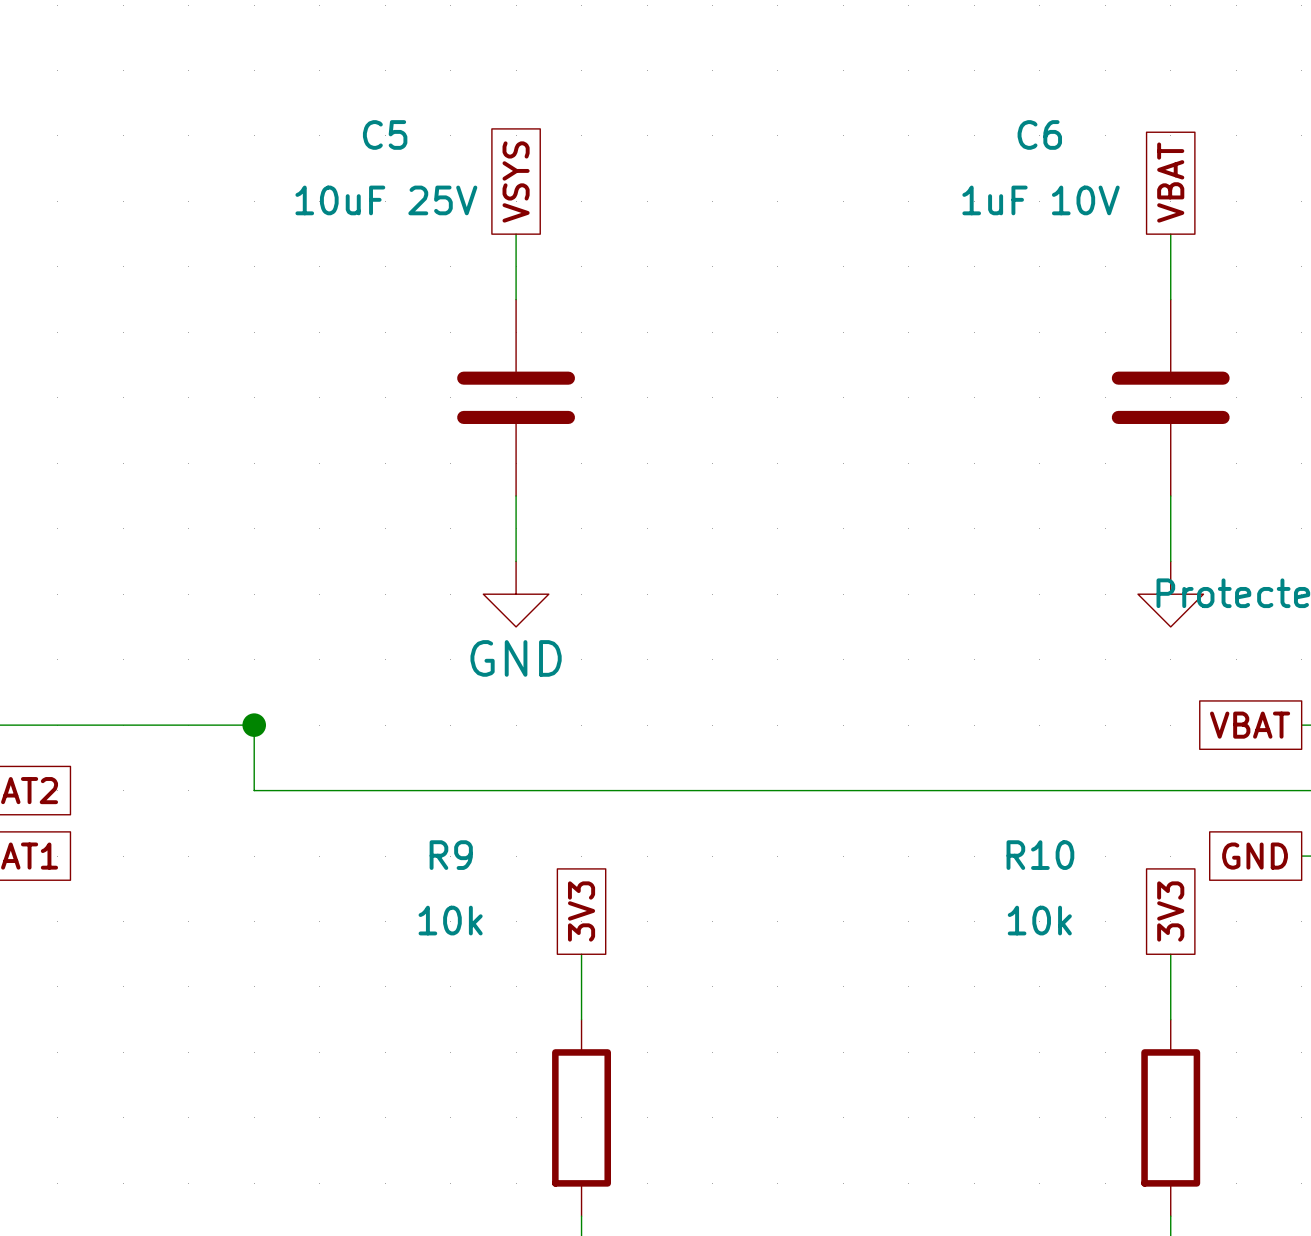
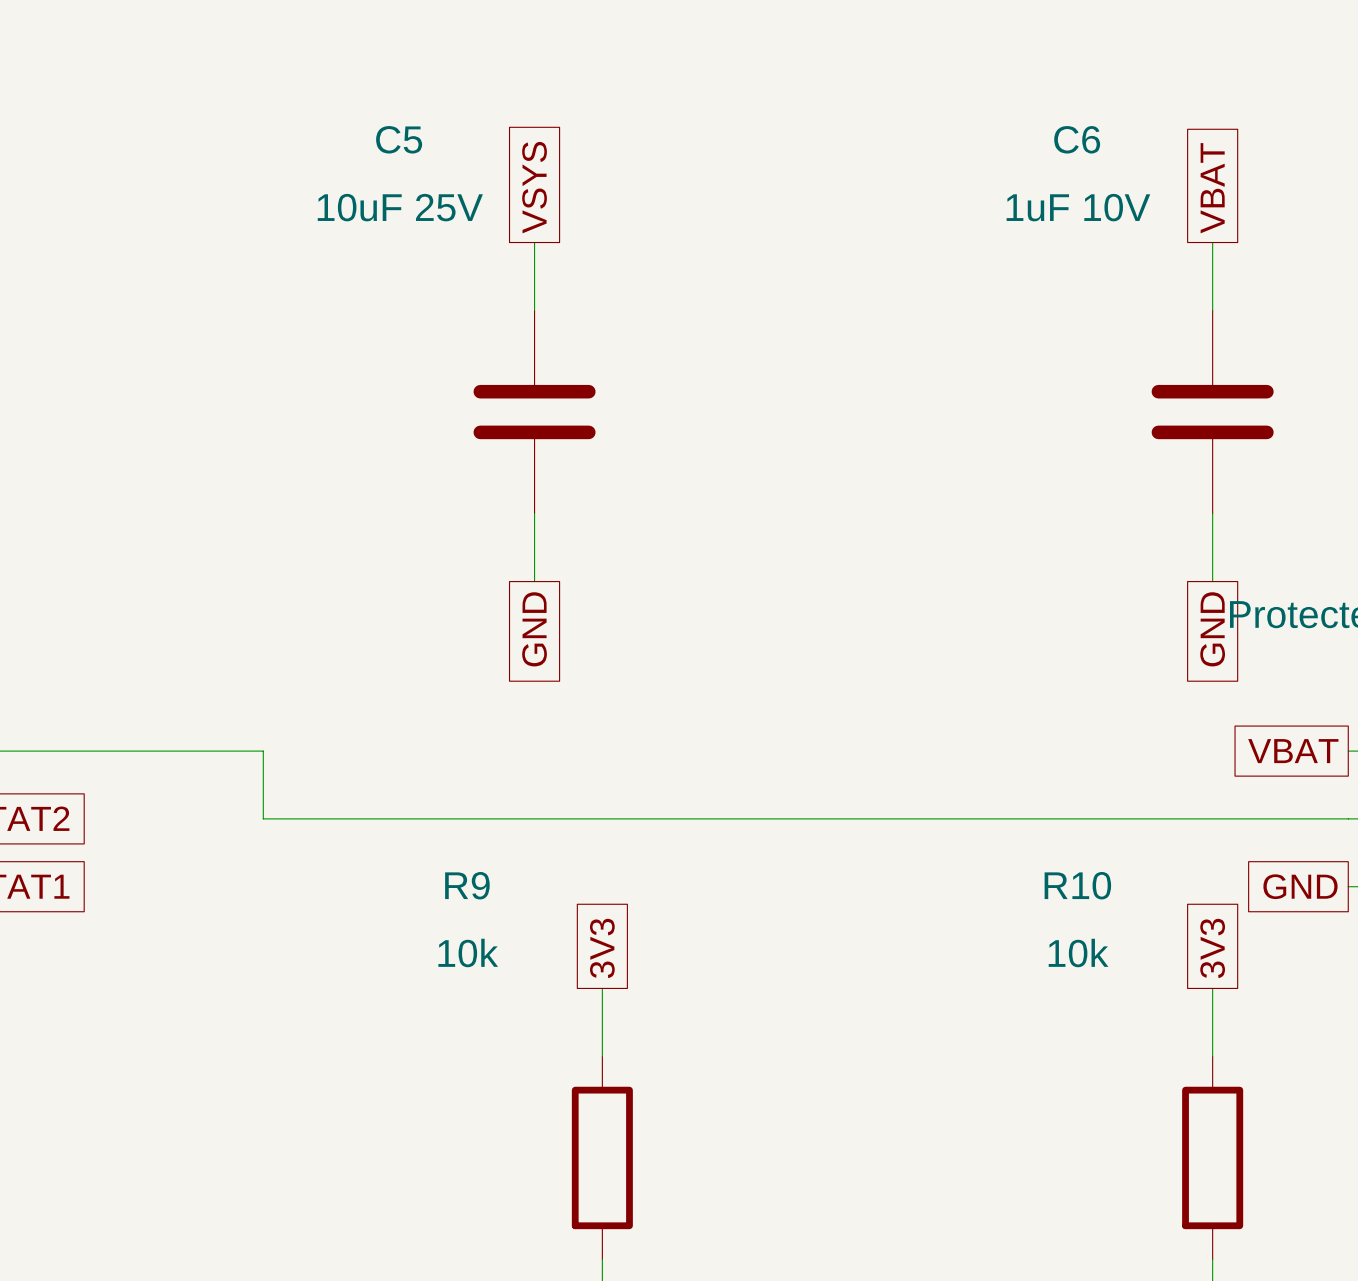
power symbol: GND (516, 594) -> none
power symbol: (1170, 594) -> none
global label: none -> GND (534, 629)
global label: none -> GND (1212, 629)
junction: (254, 725) -> none

